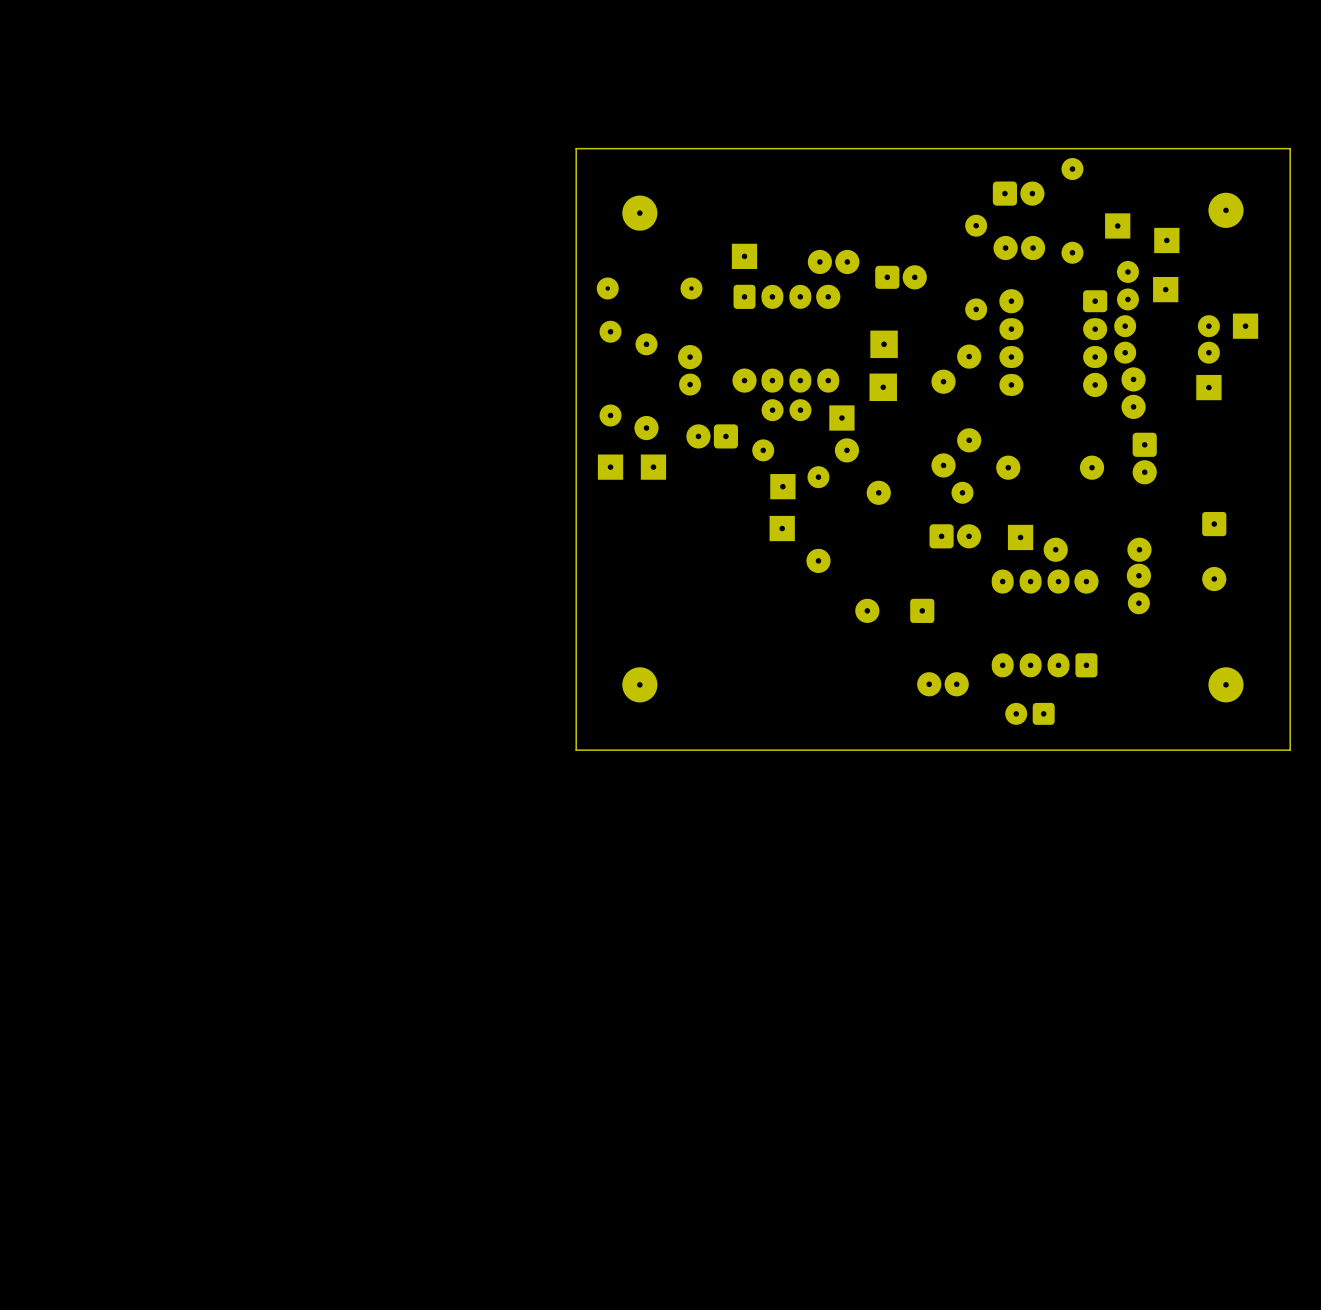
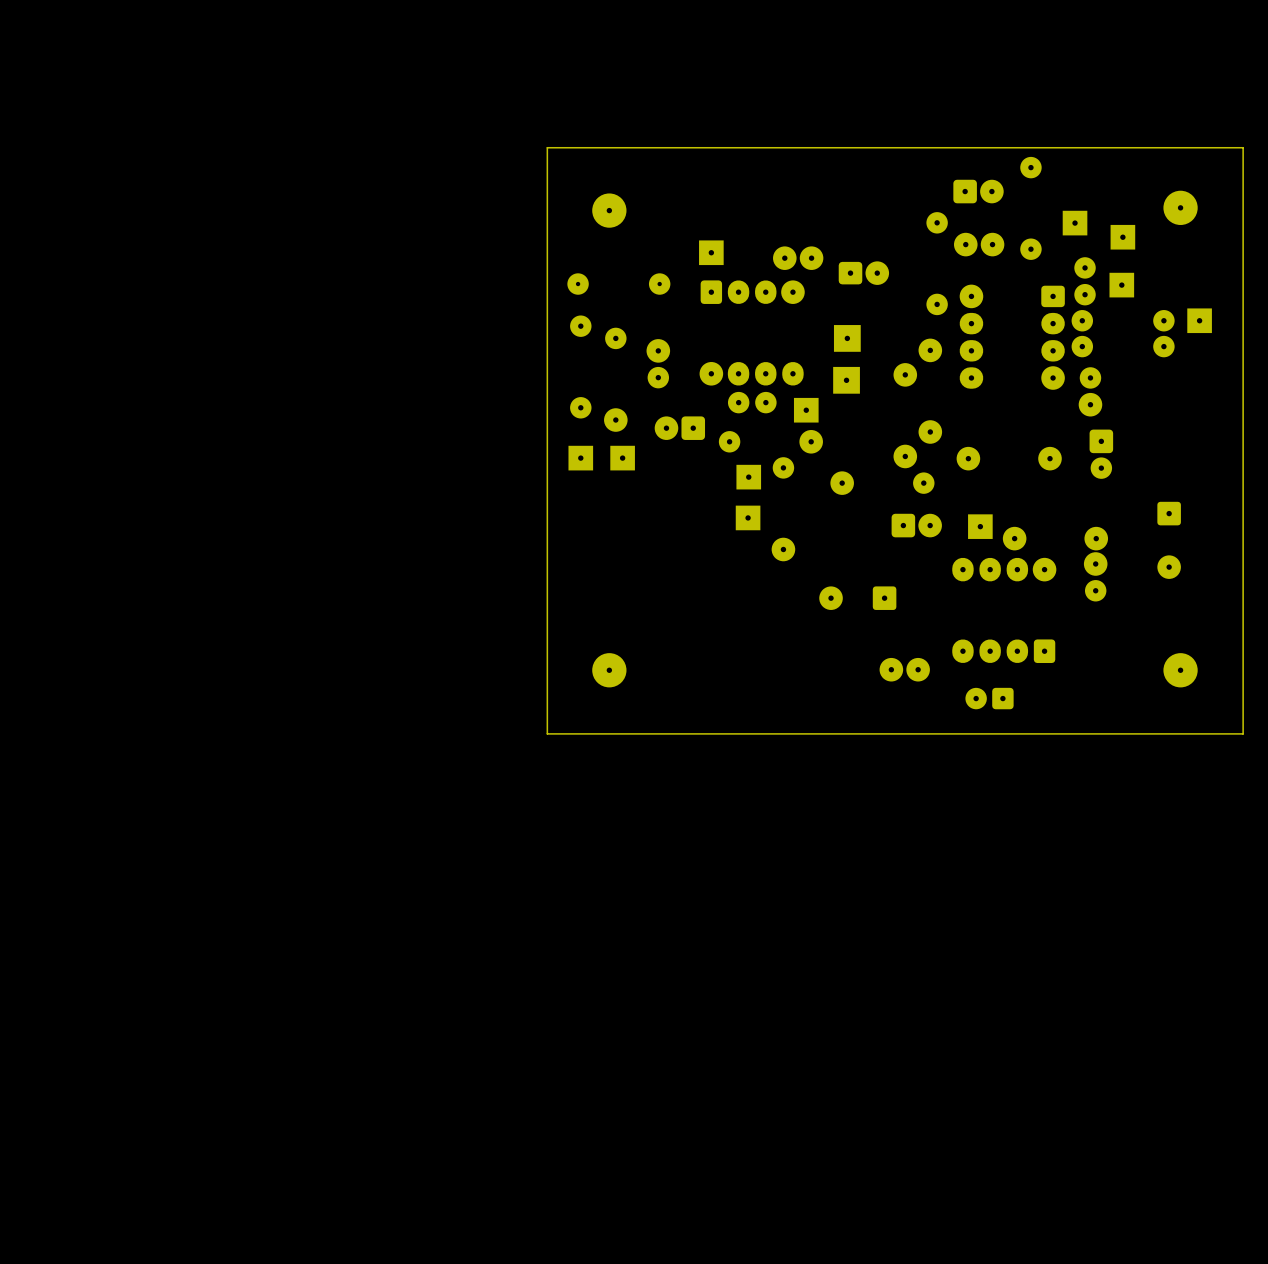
part footprint: [1121, 367, 1146, 419] -> [1078, 367, 1103, 417]
part: (1208, 387) -> none
part footprint: [1132, 432, 1157, 485] -> [1089, 429, 1114, 479]

